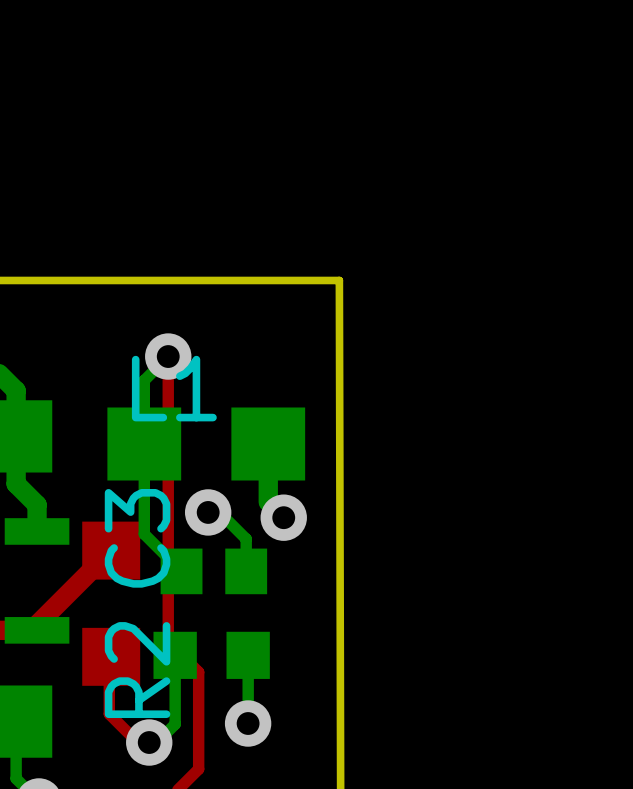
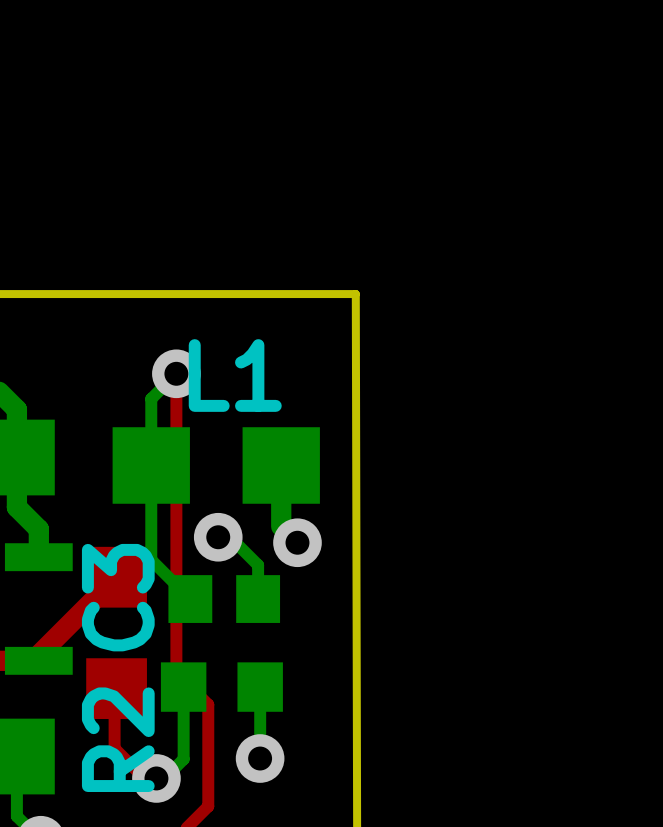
text position: L1 (174, 388) -> L1 (235, 375)
text position: C3 (137, 538) -> C3 (118, 597)
text position: R2 (137, 670) -> R2 (118, 739)

